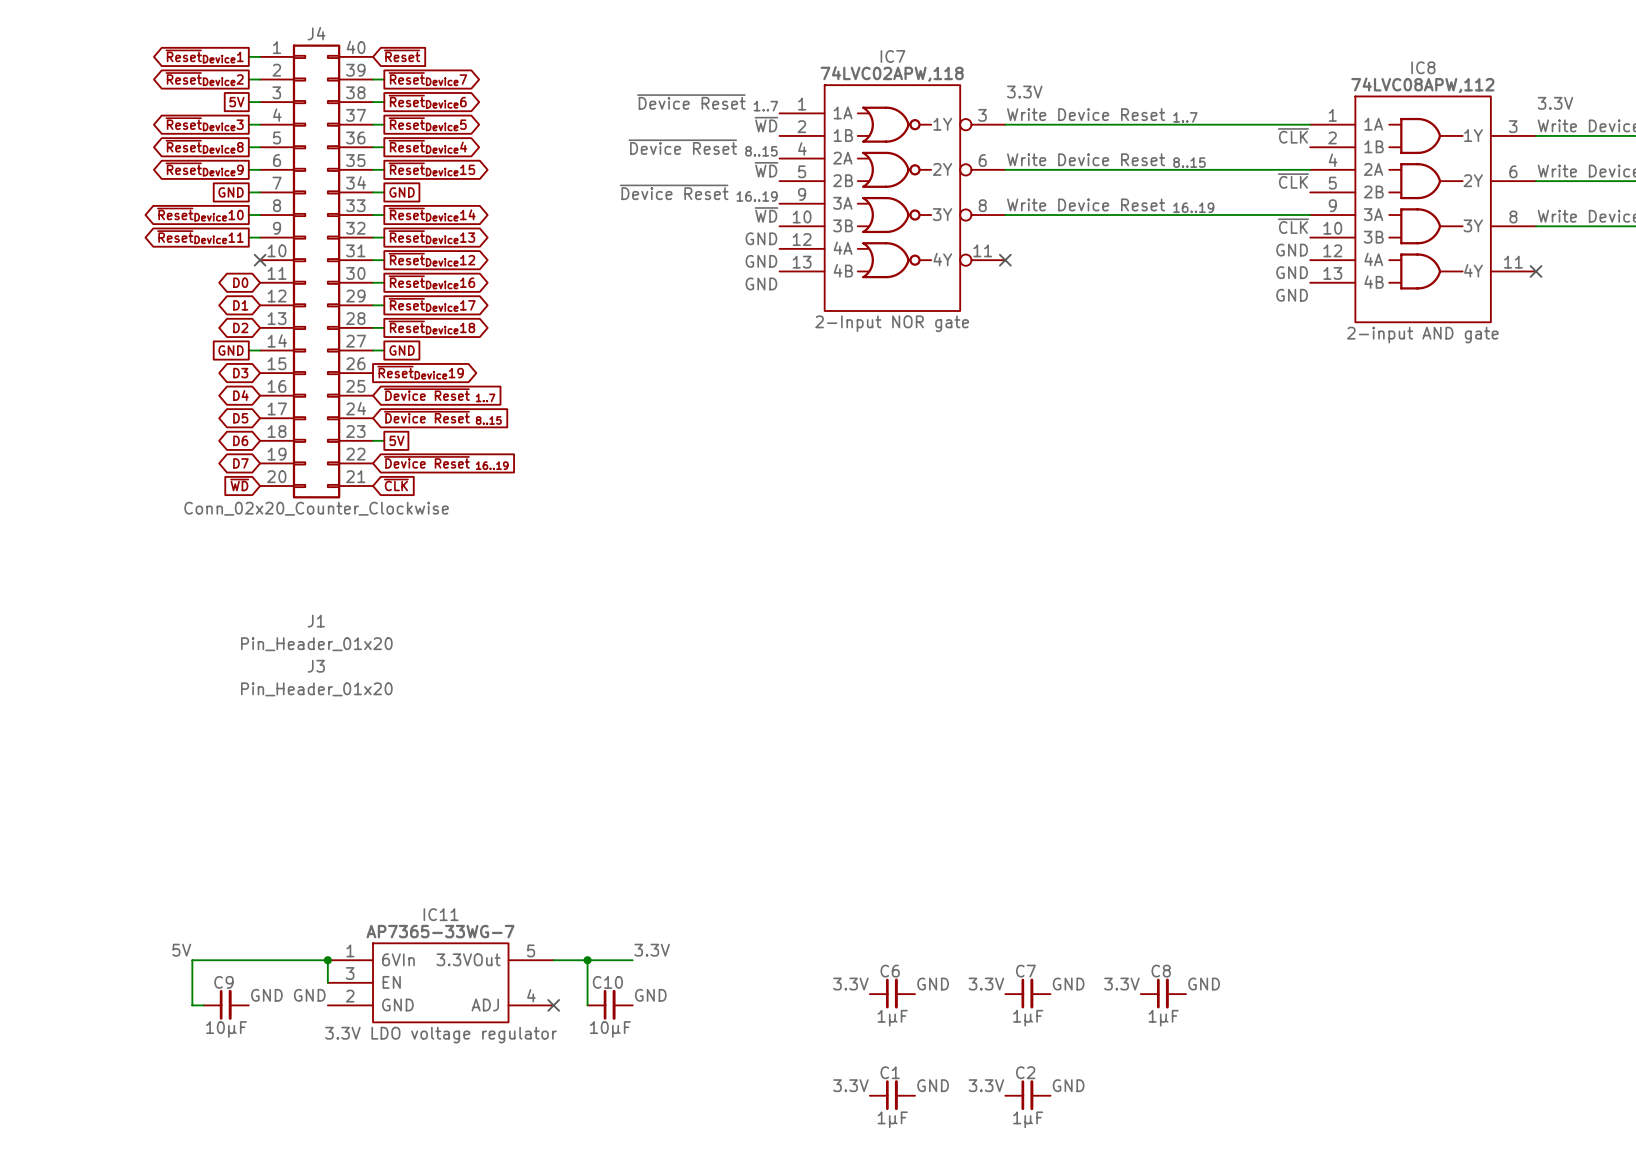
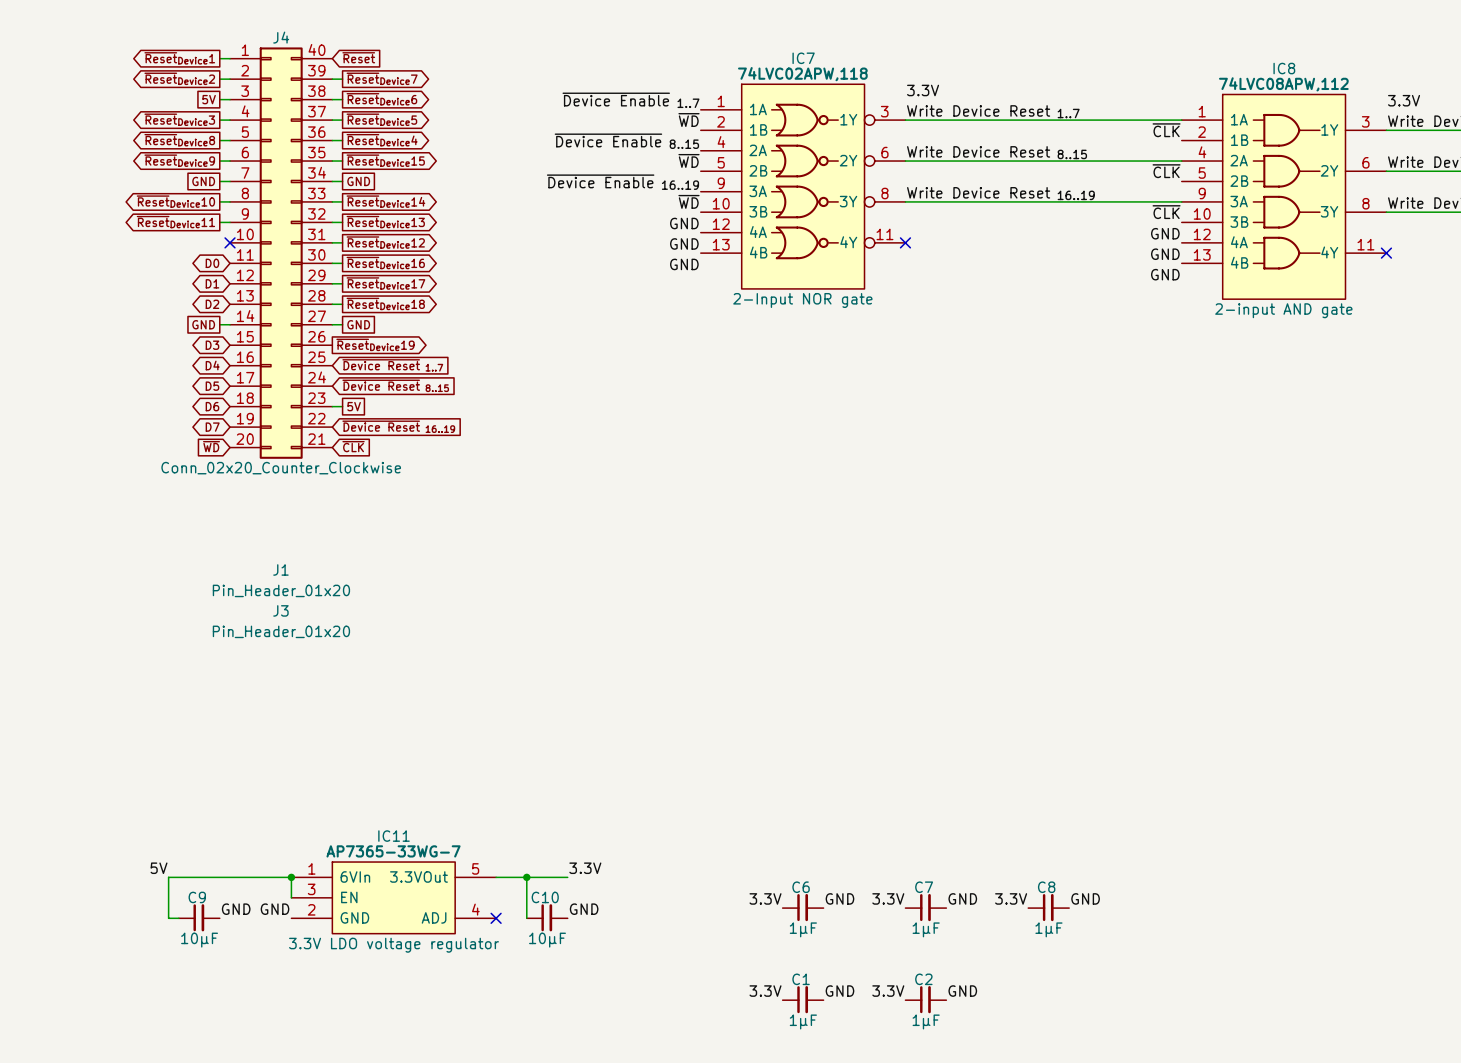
label: ~{Device Reset} 1..7 (707, 102) -> ~{Device Enable} 1..7 (630, 100)
label: ~{Device Reset} 8..15 (703, 148) -> ~{Device Enable} 8..15 (626, 141)
label: ~{Device Reset} 16..19 (698, 193) -> ~{Device Enable} 16..19 (622, 182)

